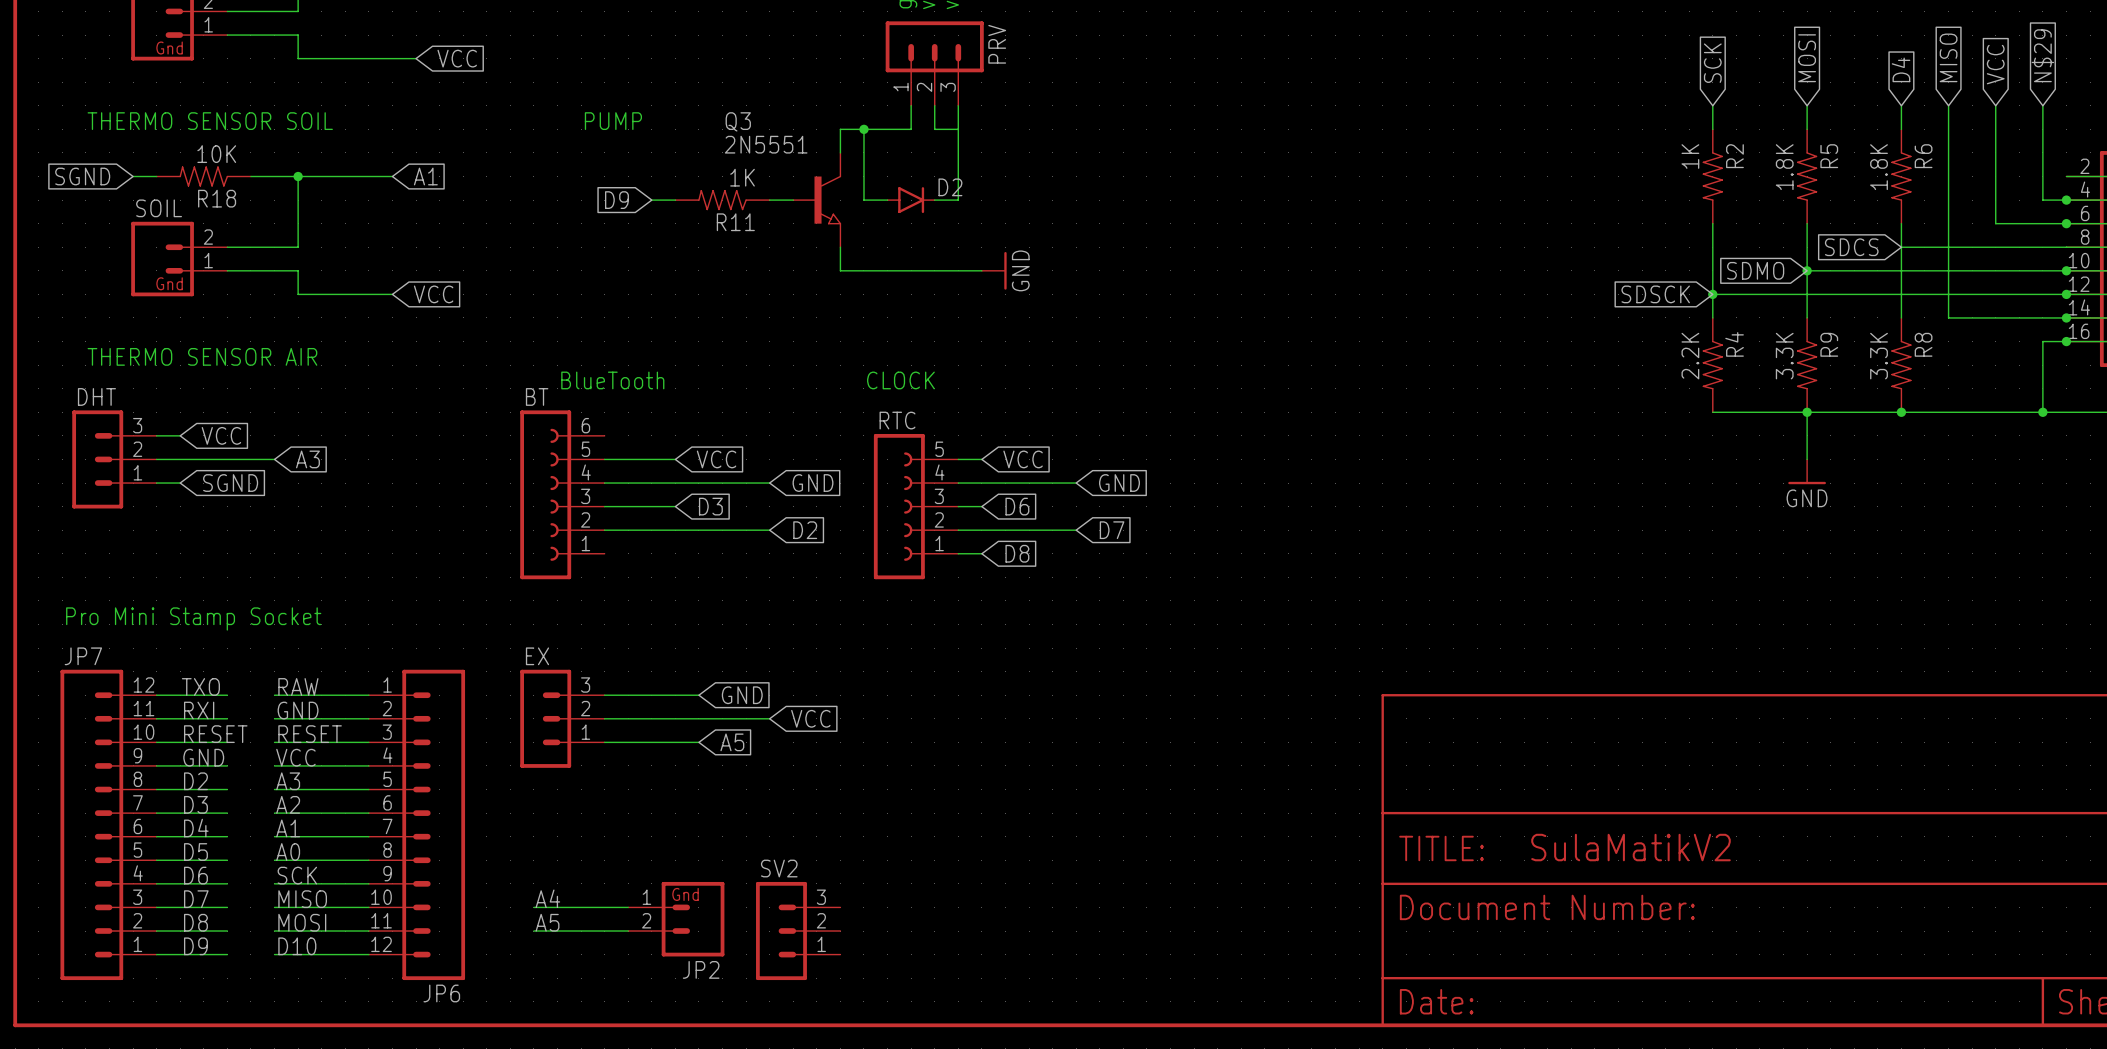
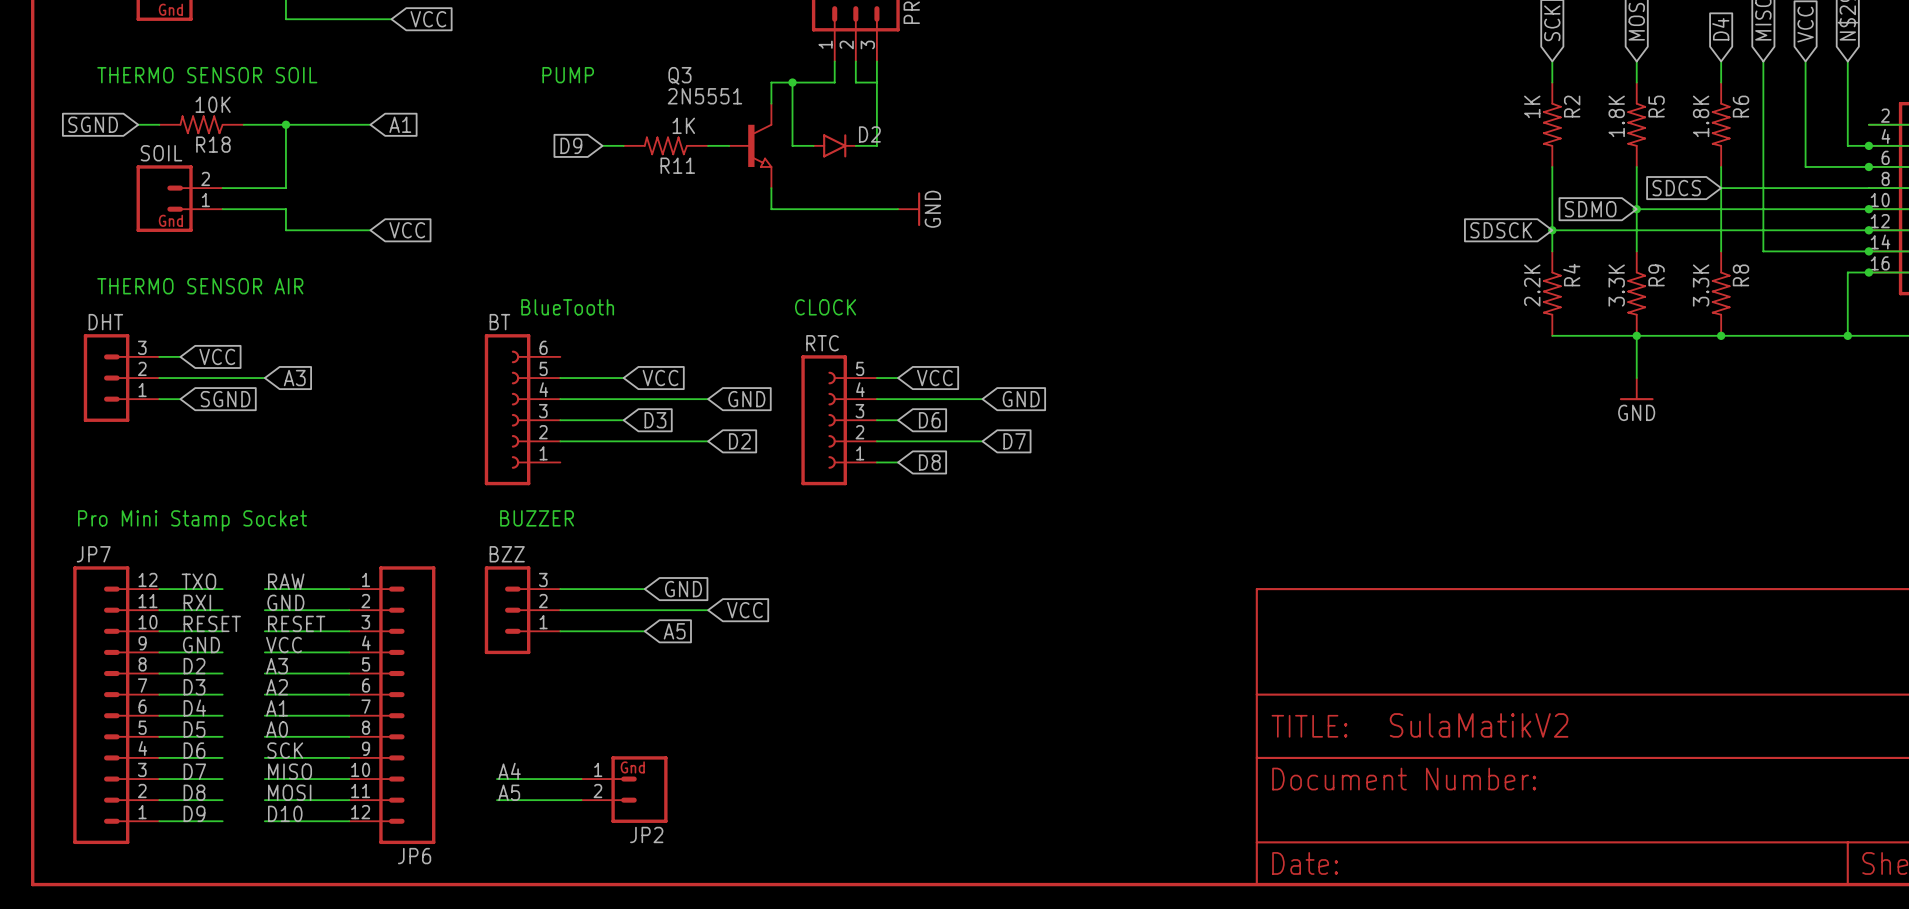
text: none -> BUZZER (537, 518)
EX name: EX (537, 656) -> BZZ (507, 554)
SV2: (798, 931) -> none

